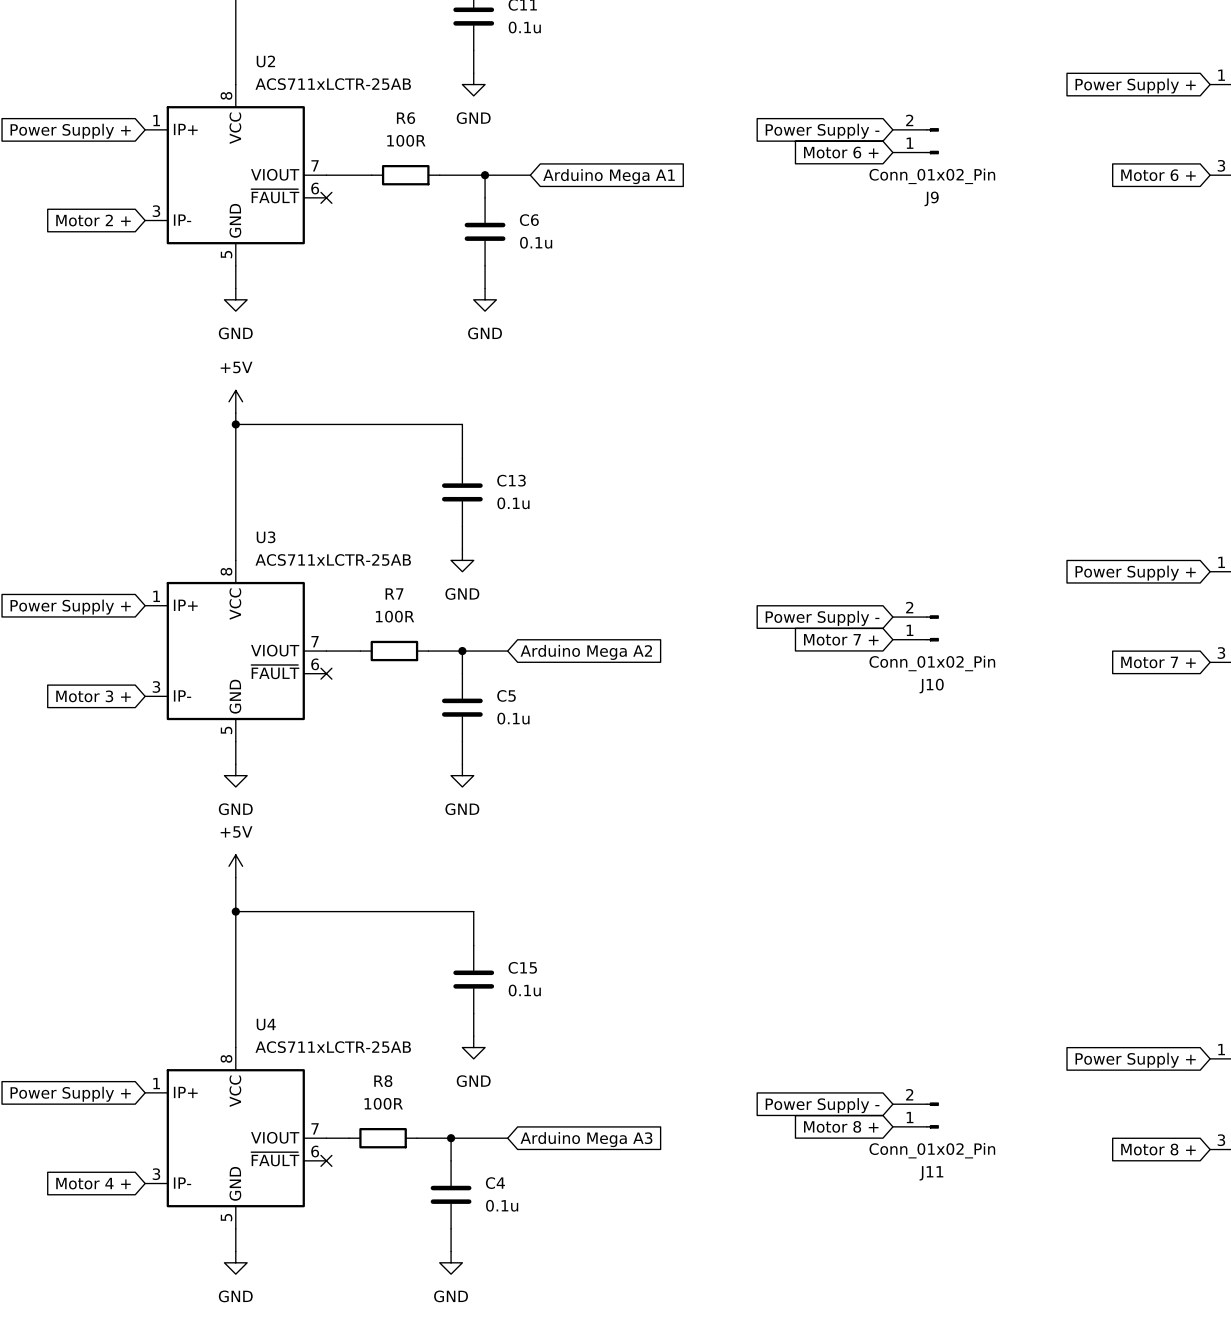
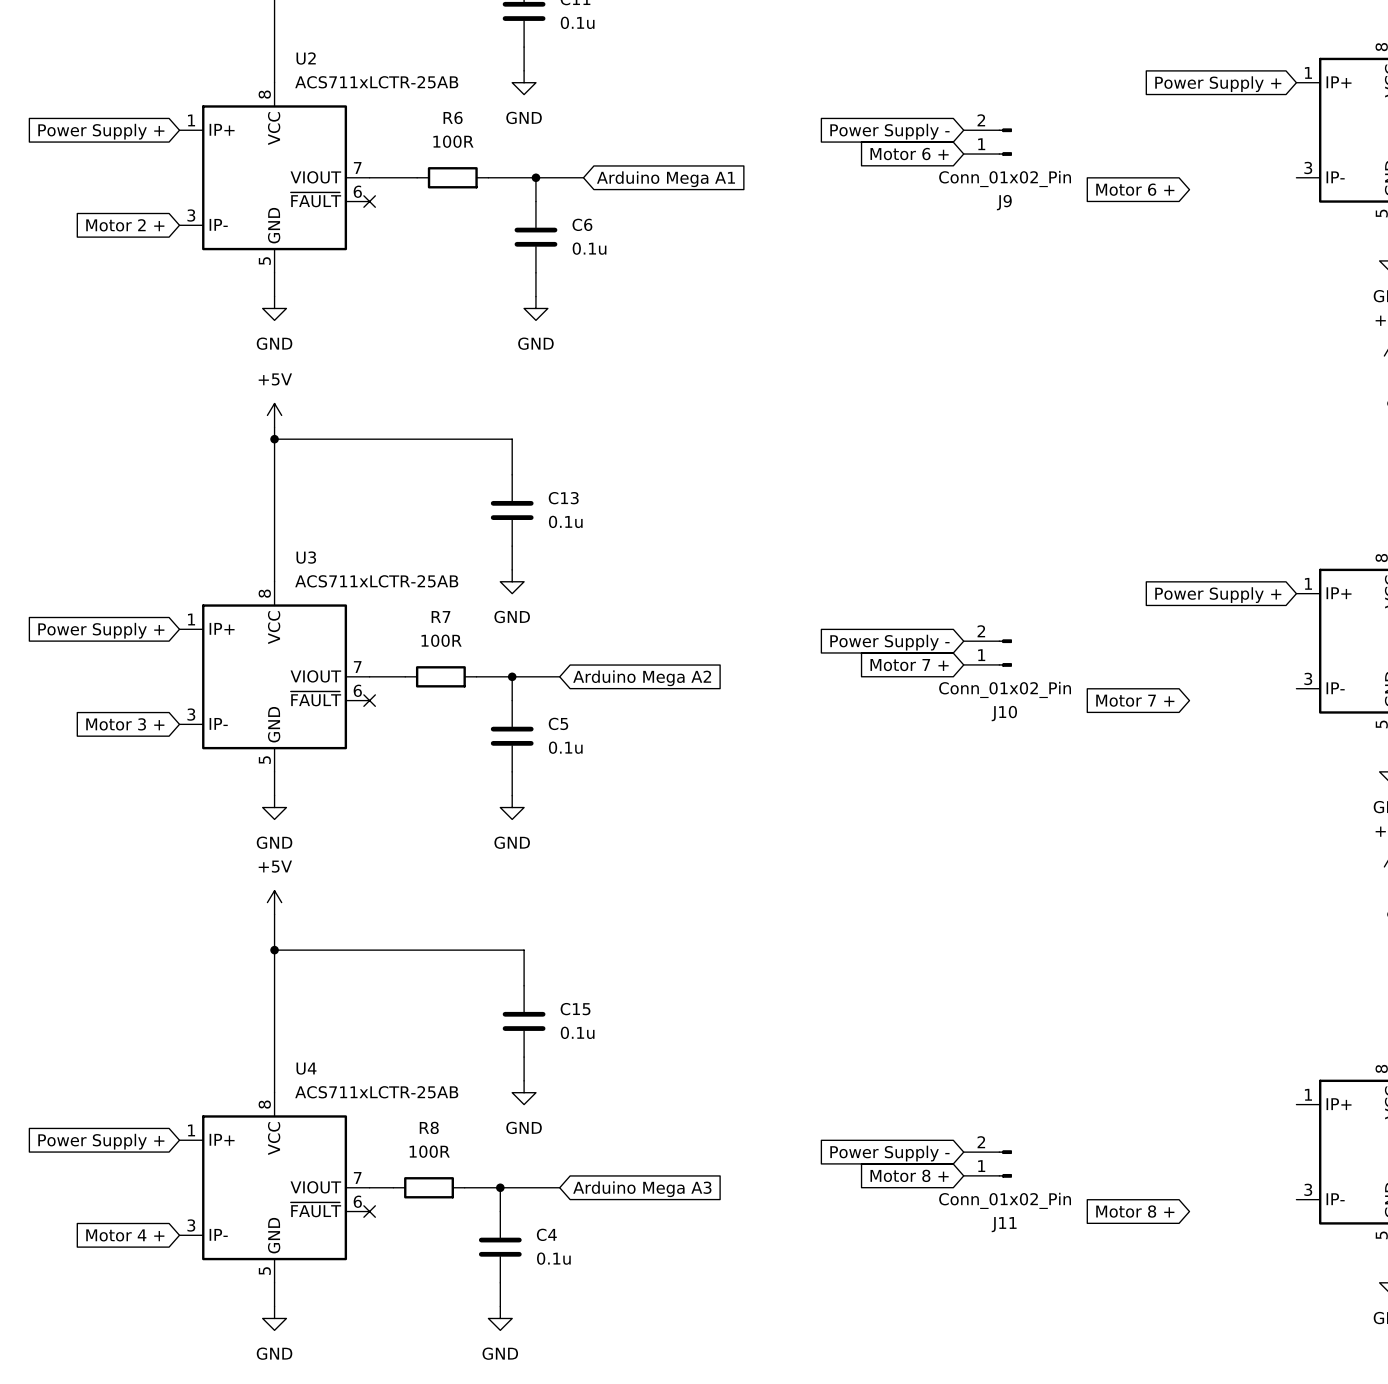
global label position: Motor 6 + (1158, 175) -> Motor 6 + (1135, 189)
global label position: Motor 7 + (1158, 662) -> Motor 7 + (1135, 700)
global label: Power Supply + (1135, 1060) -> none
global label position: Motor 8 + (1158, 1149) -> Motor 8 + (1135, 1211)

